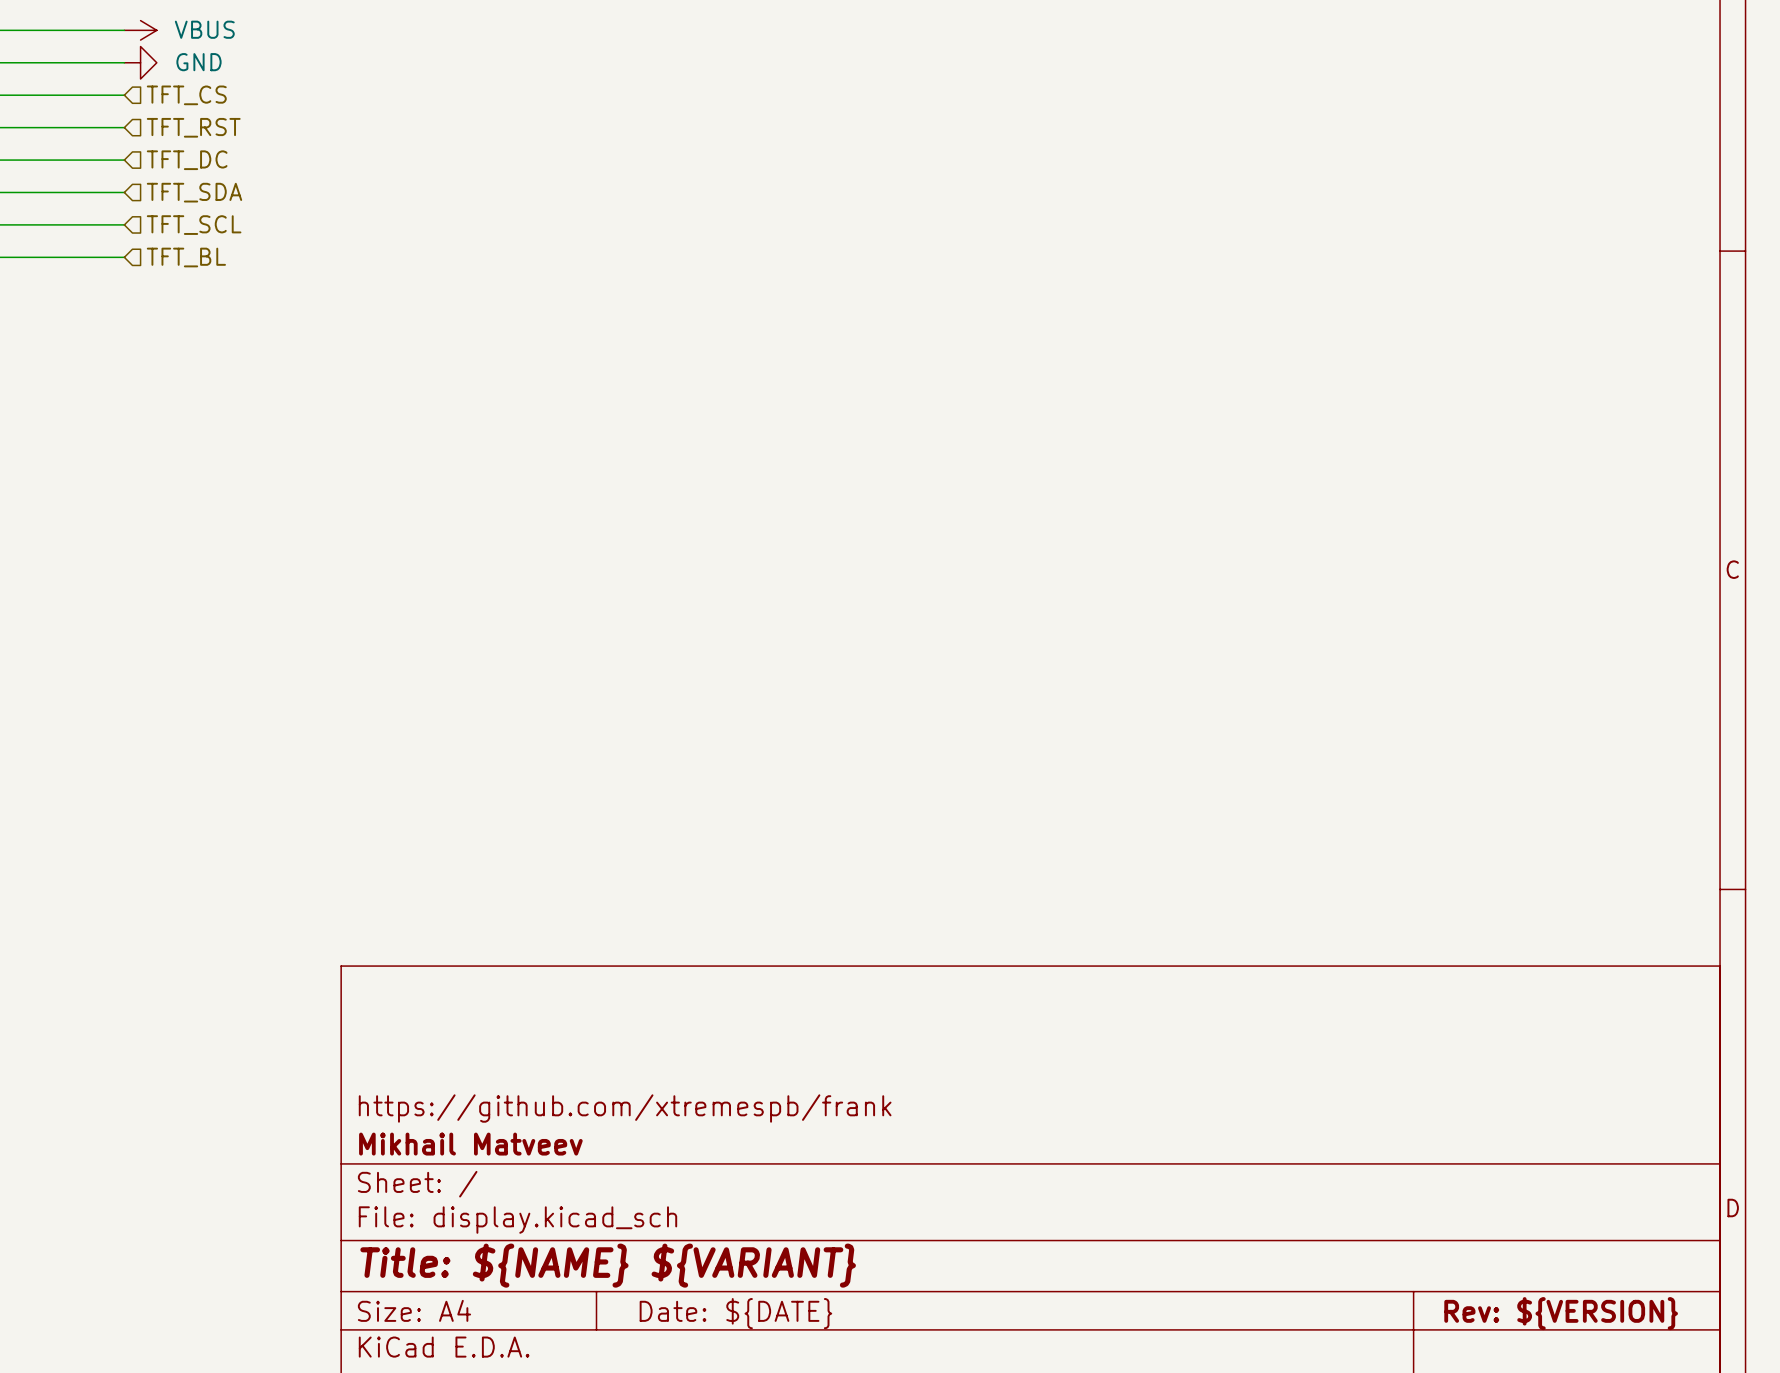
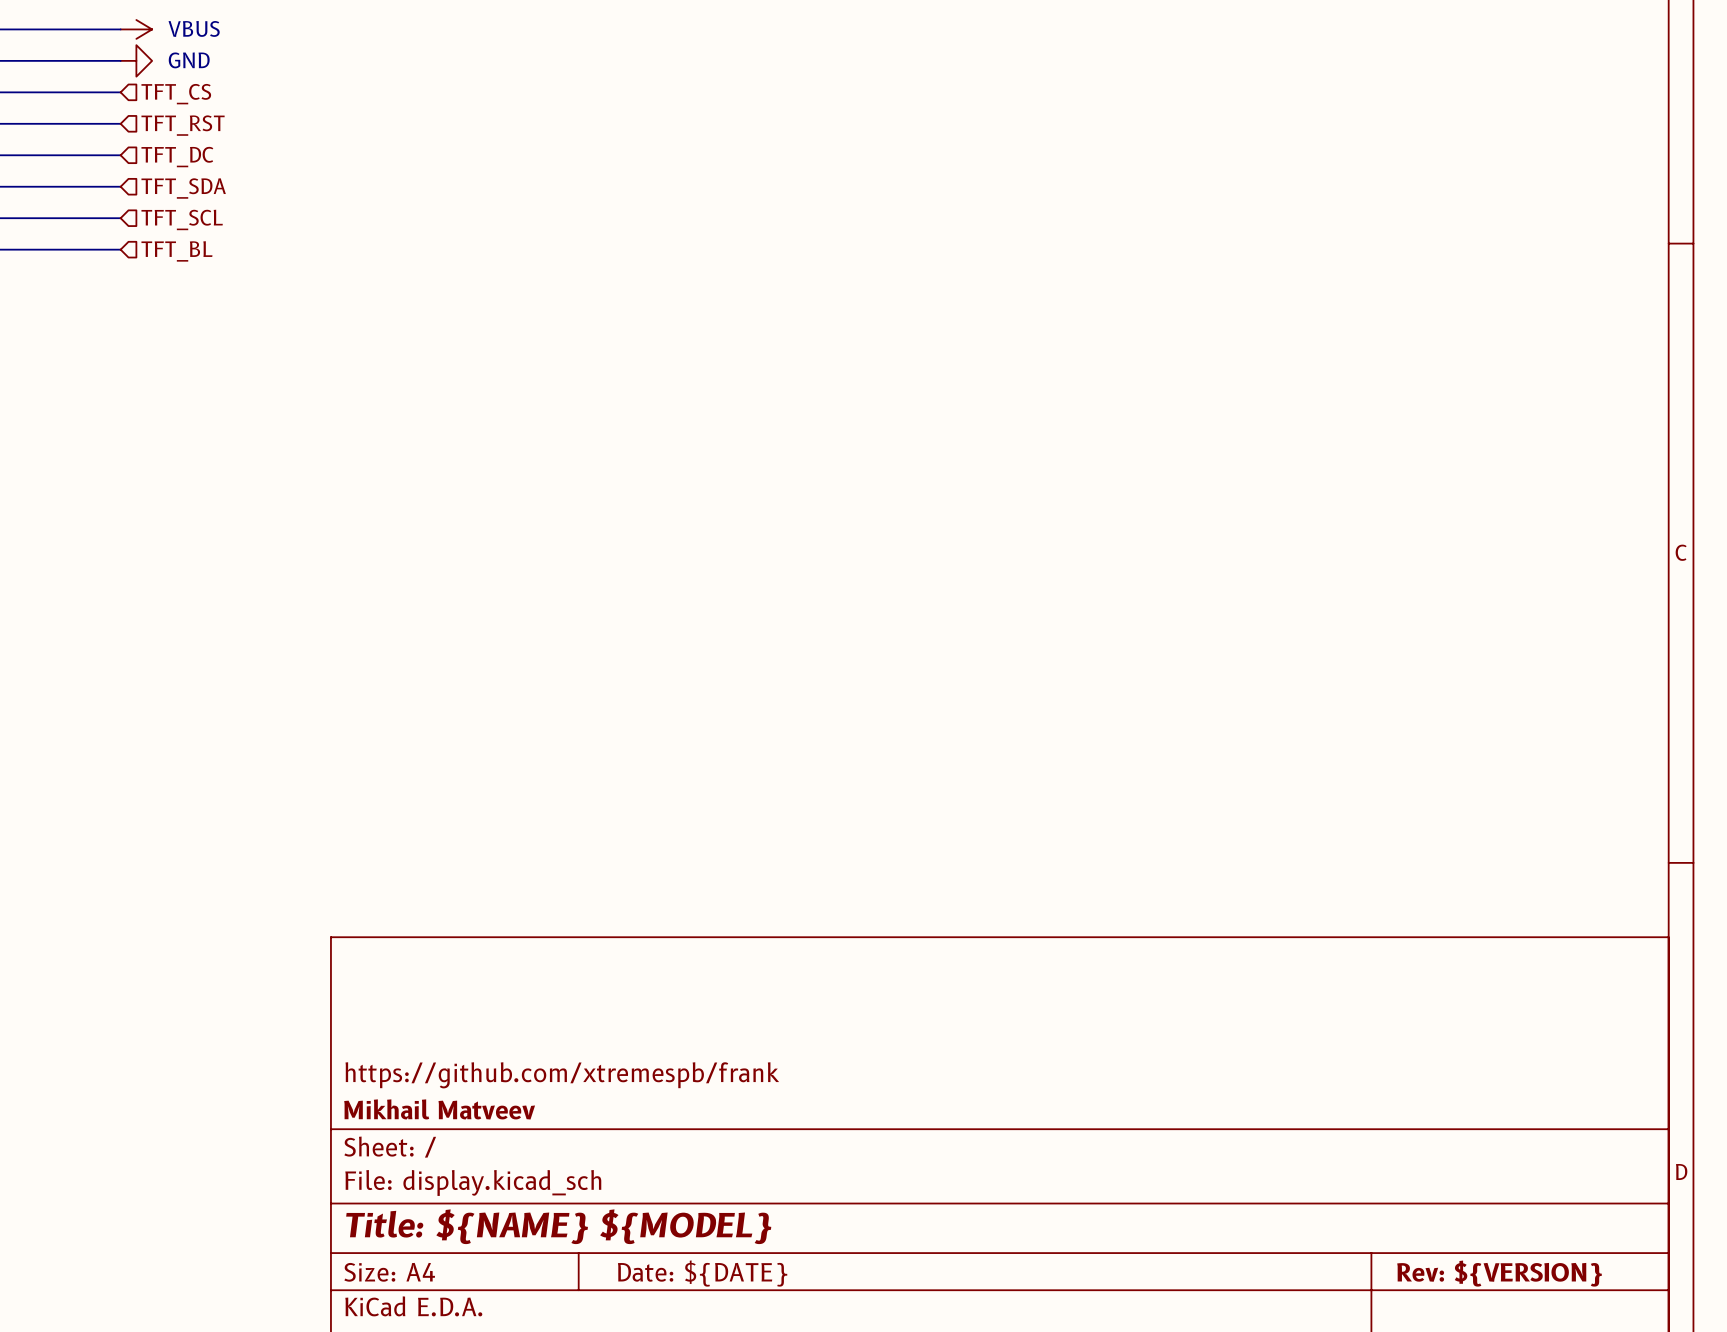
title block: Title: ${NAME} ${VARIANT} (608, 1265) -> Title: ${NAME} ${MODEL} (558, 1226)

